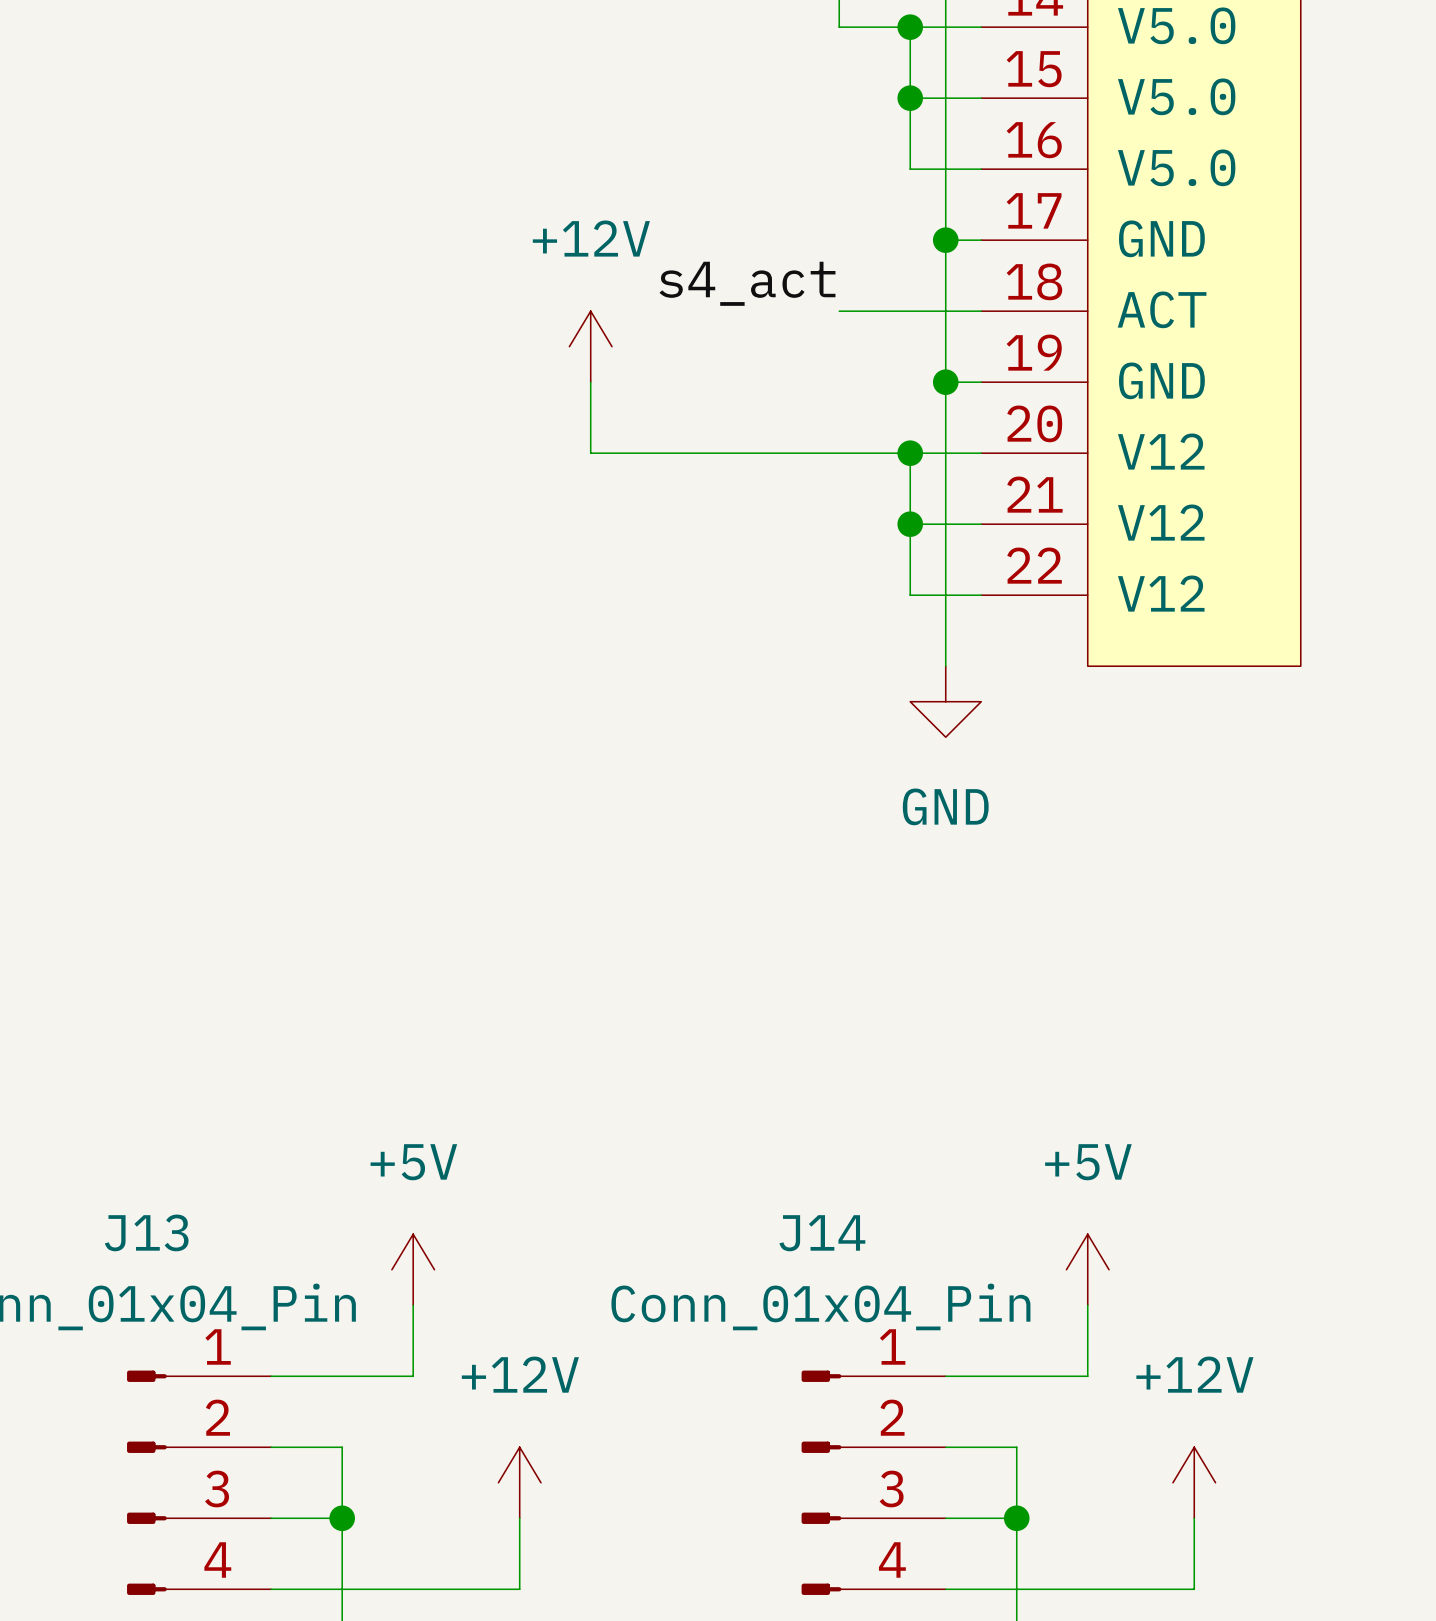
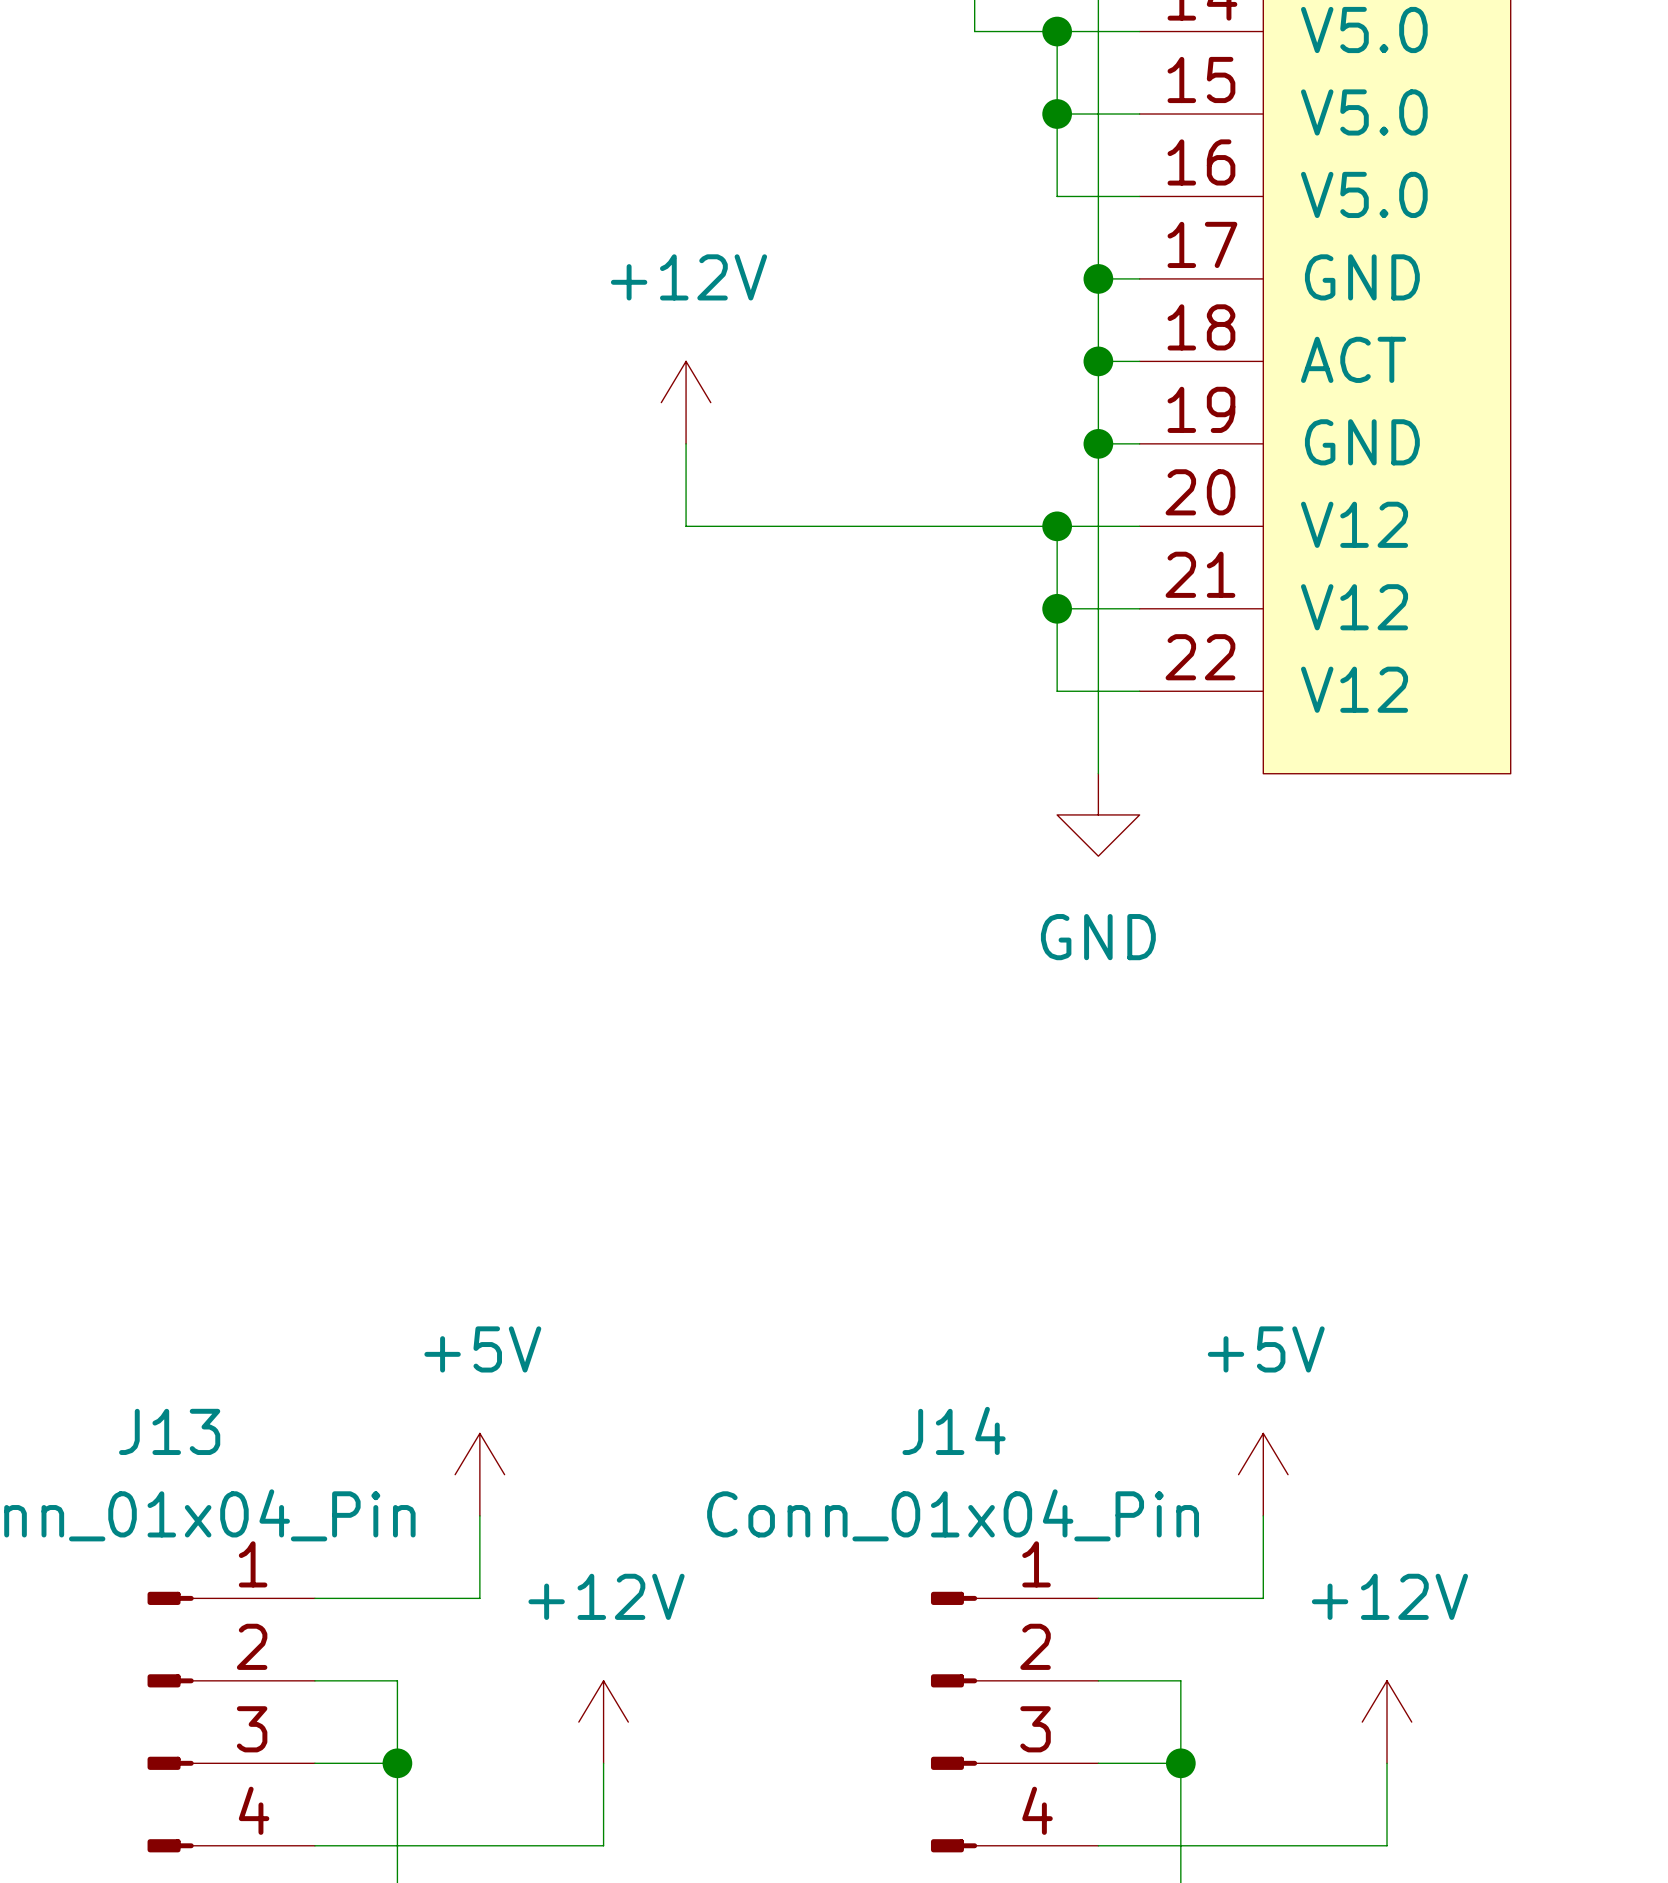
label: s4_act (747, 283) -> none
wire: (839, 311) (945, 311) -> none
junction: none -> (1098, 361)

